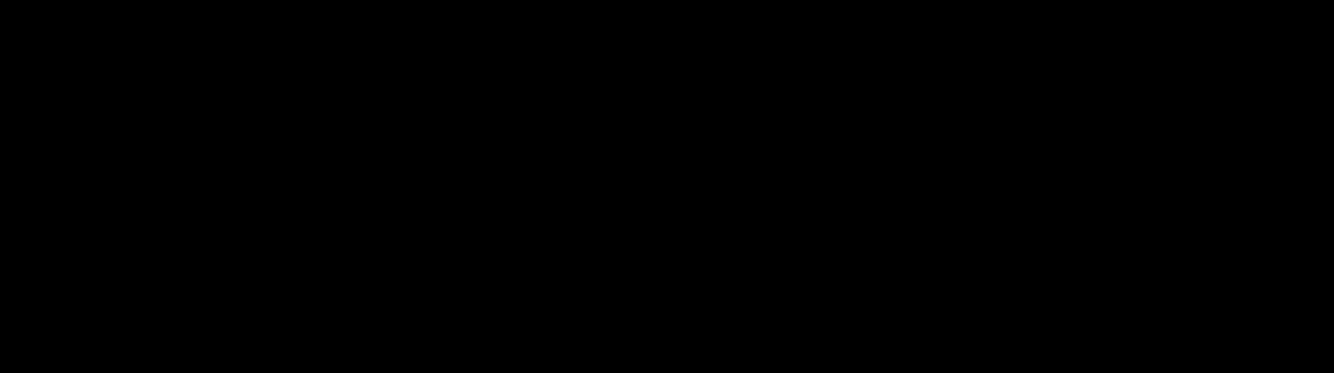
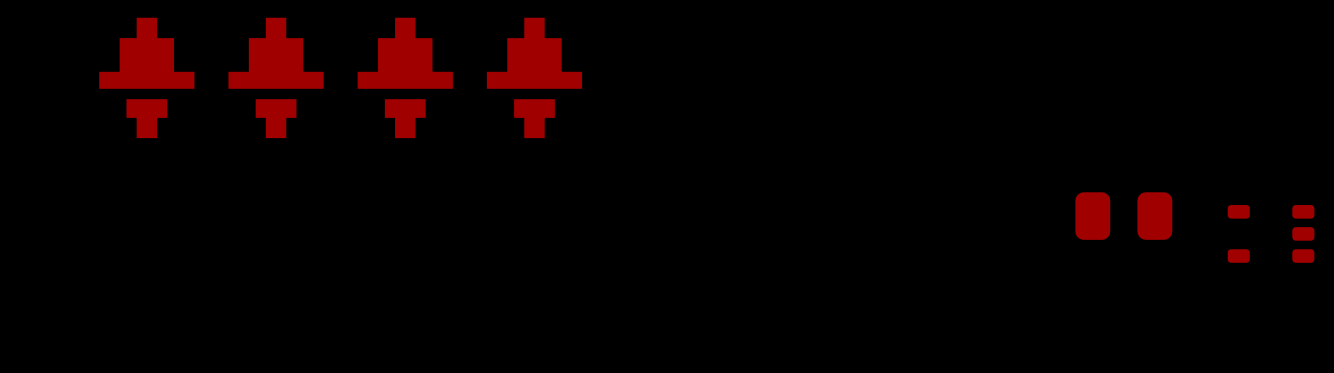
part: none -> (146, 77)
part: none -> (276, 77)
part: none -> (405, 77)
part: none -> (534, 77)
part: none -> (1123, 216)
part: none -> (1271, 233)

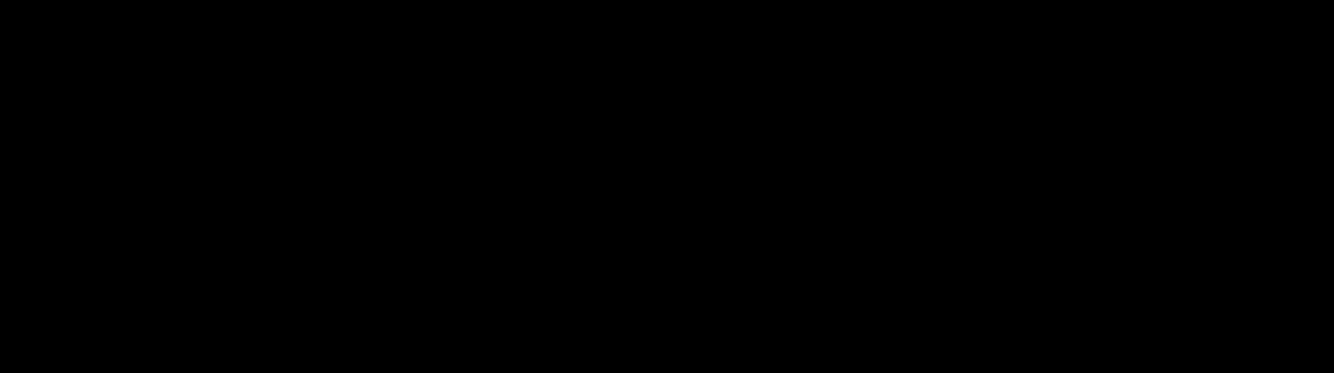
part: (146, 77) -> none
part: (276, 77) -> none
part: (405, 77) -> none
part: (534, 77) -> none
part: (1123, 216) -> none
part: (1271, 233) -> none

